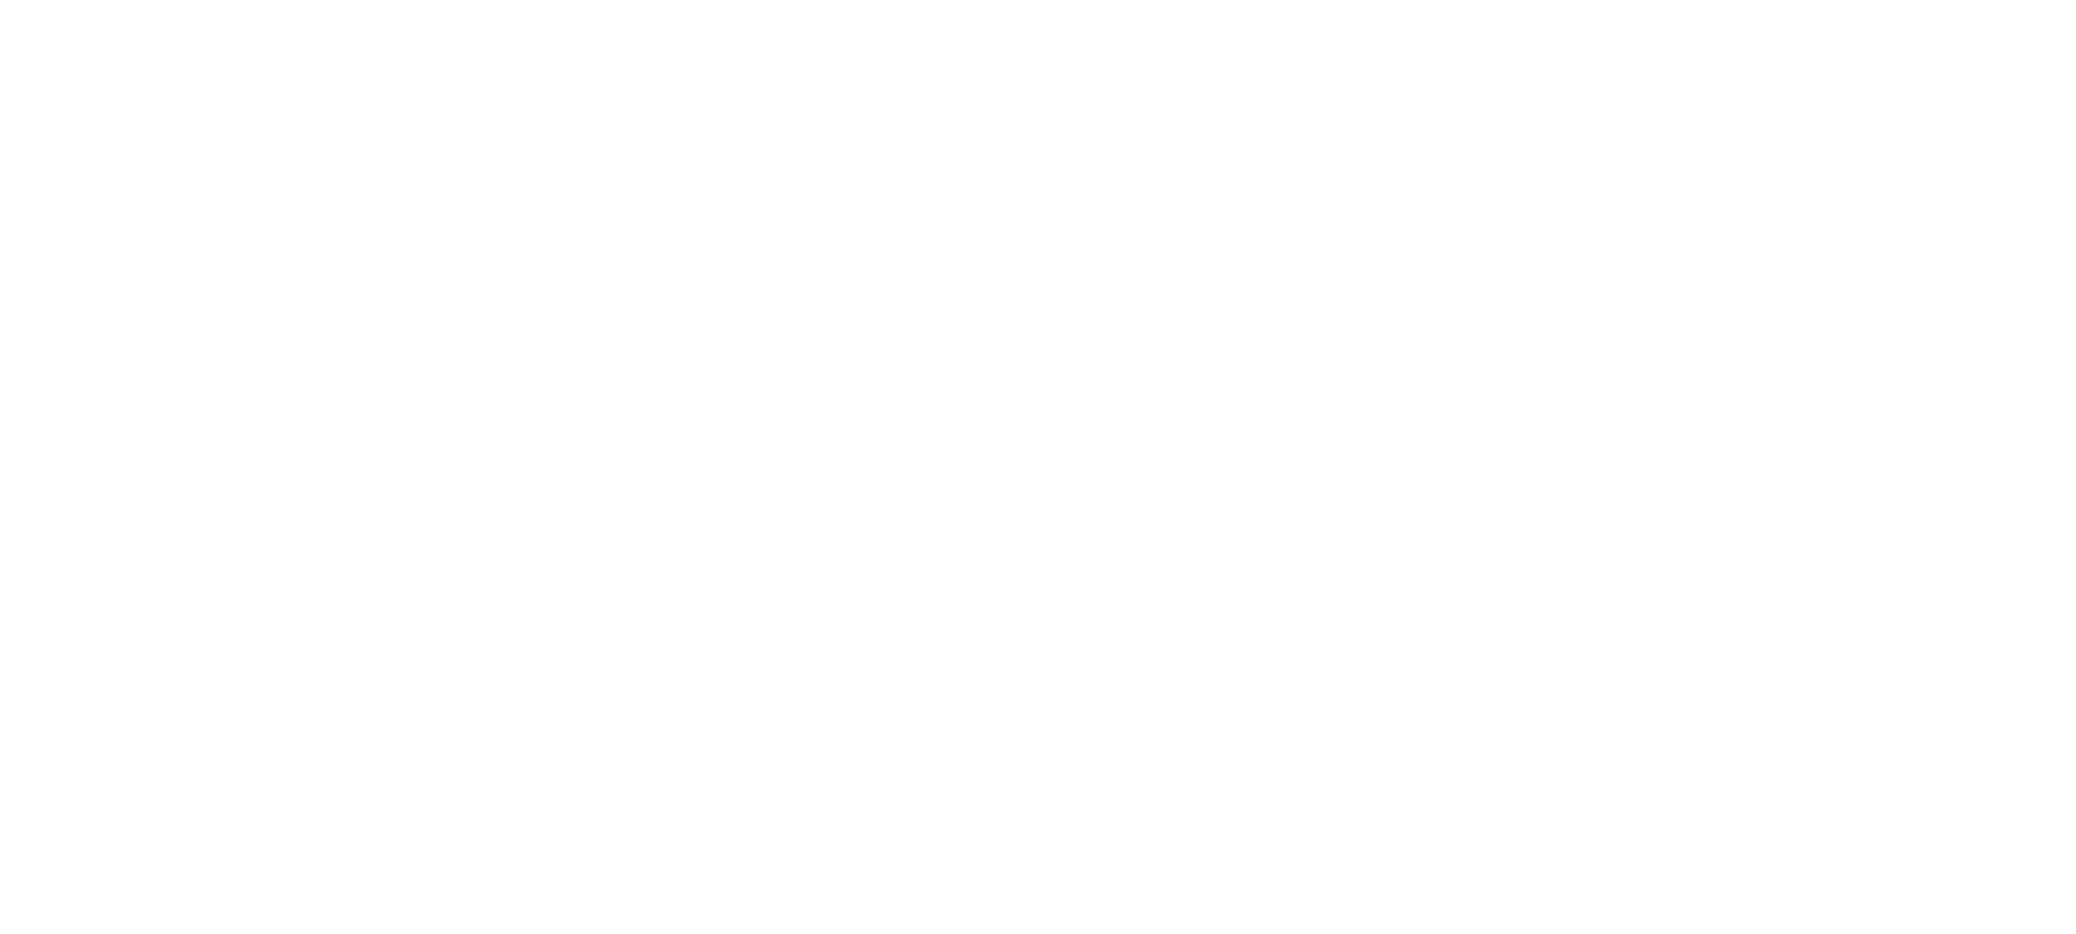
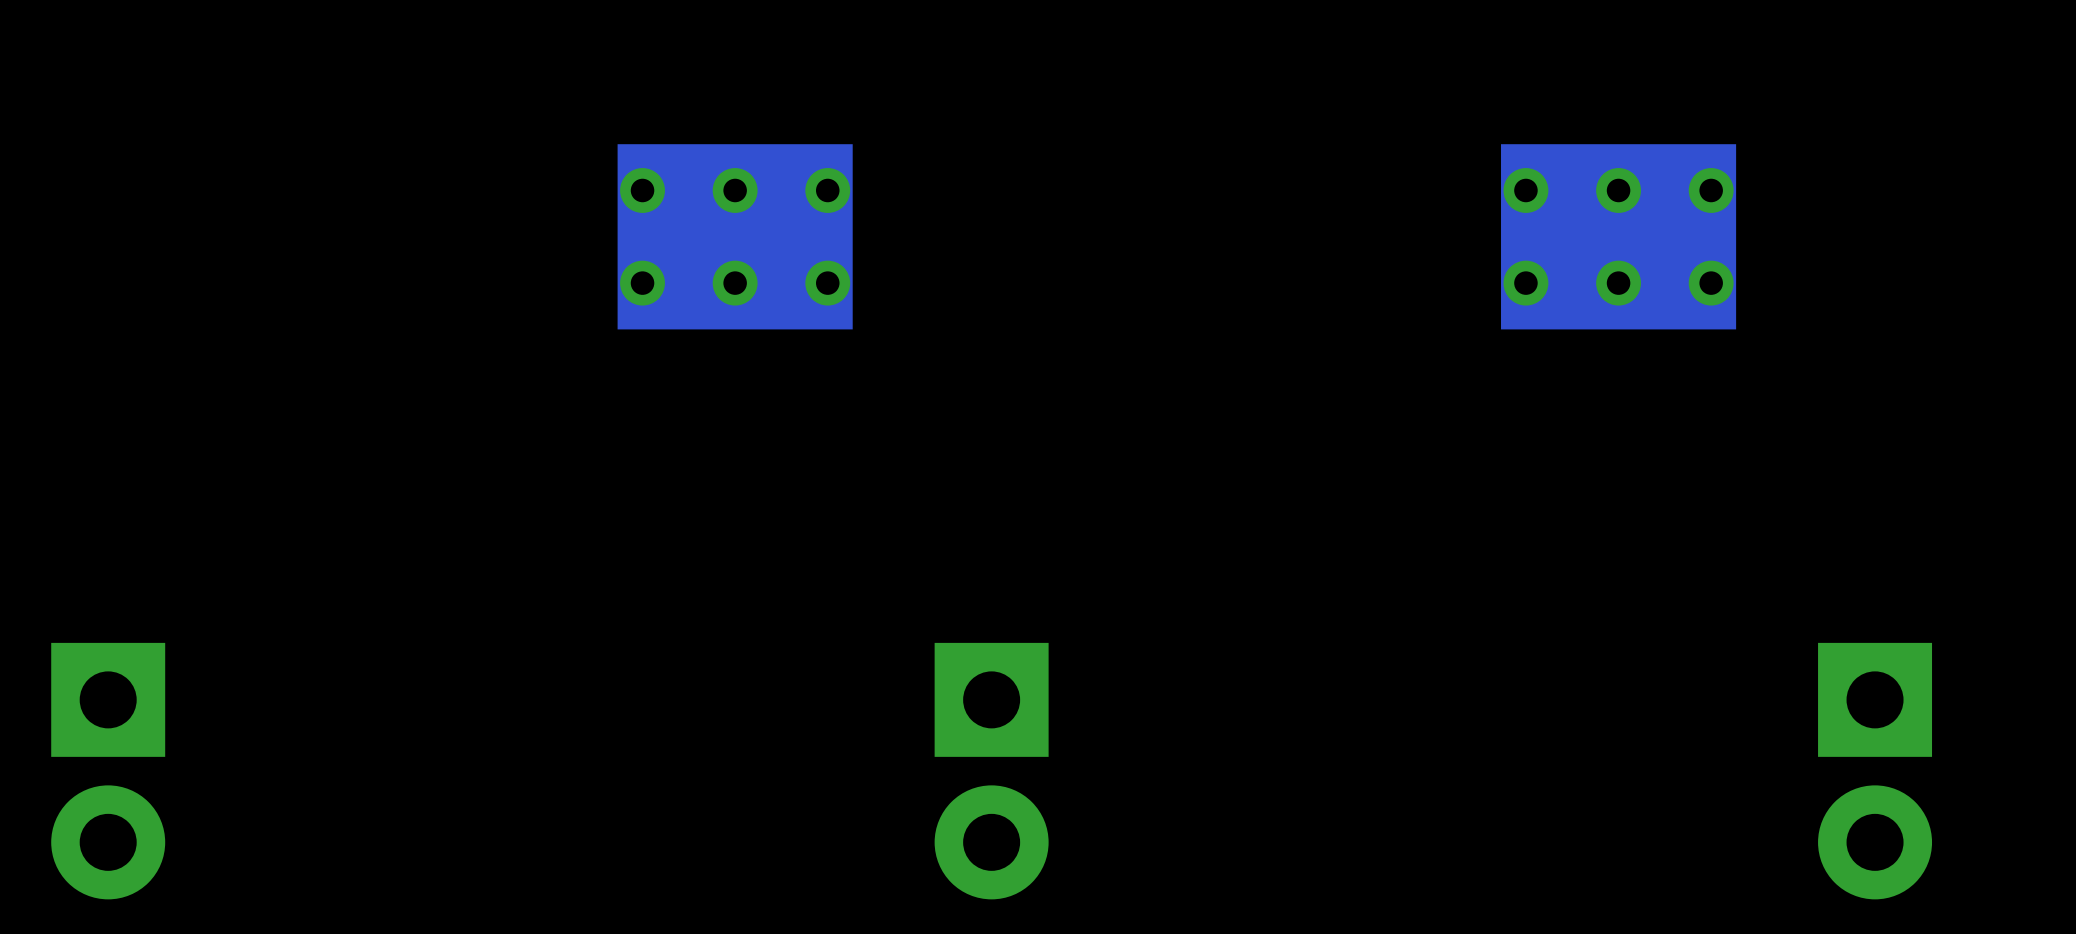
part: none -> (735, 236)
part: none -> (1618, 236)
part: none -> (108, 771)
part: none -> (991, 771)
part: none -> (1875, 771)

